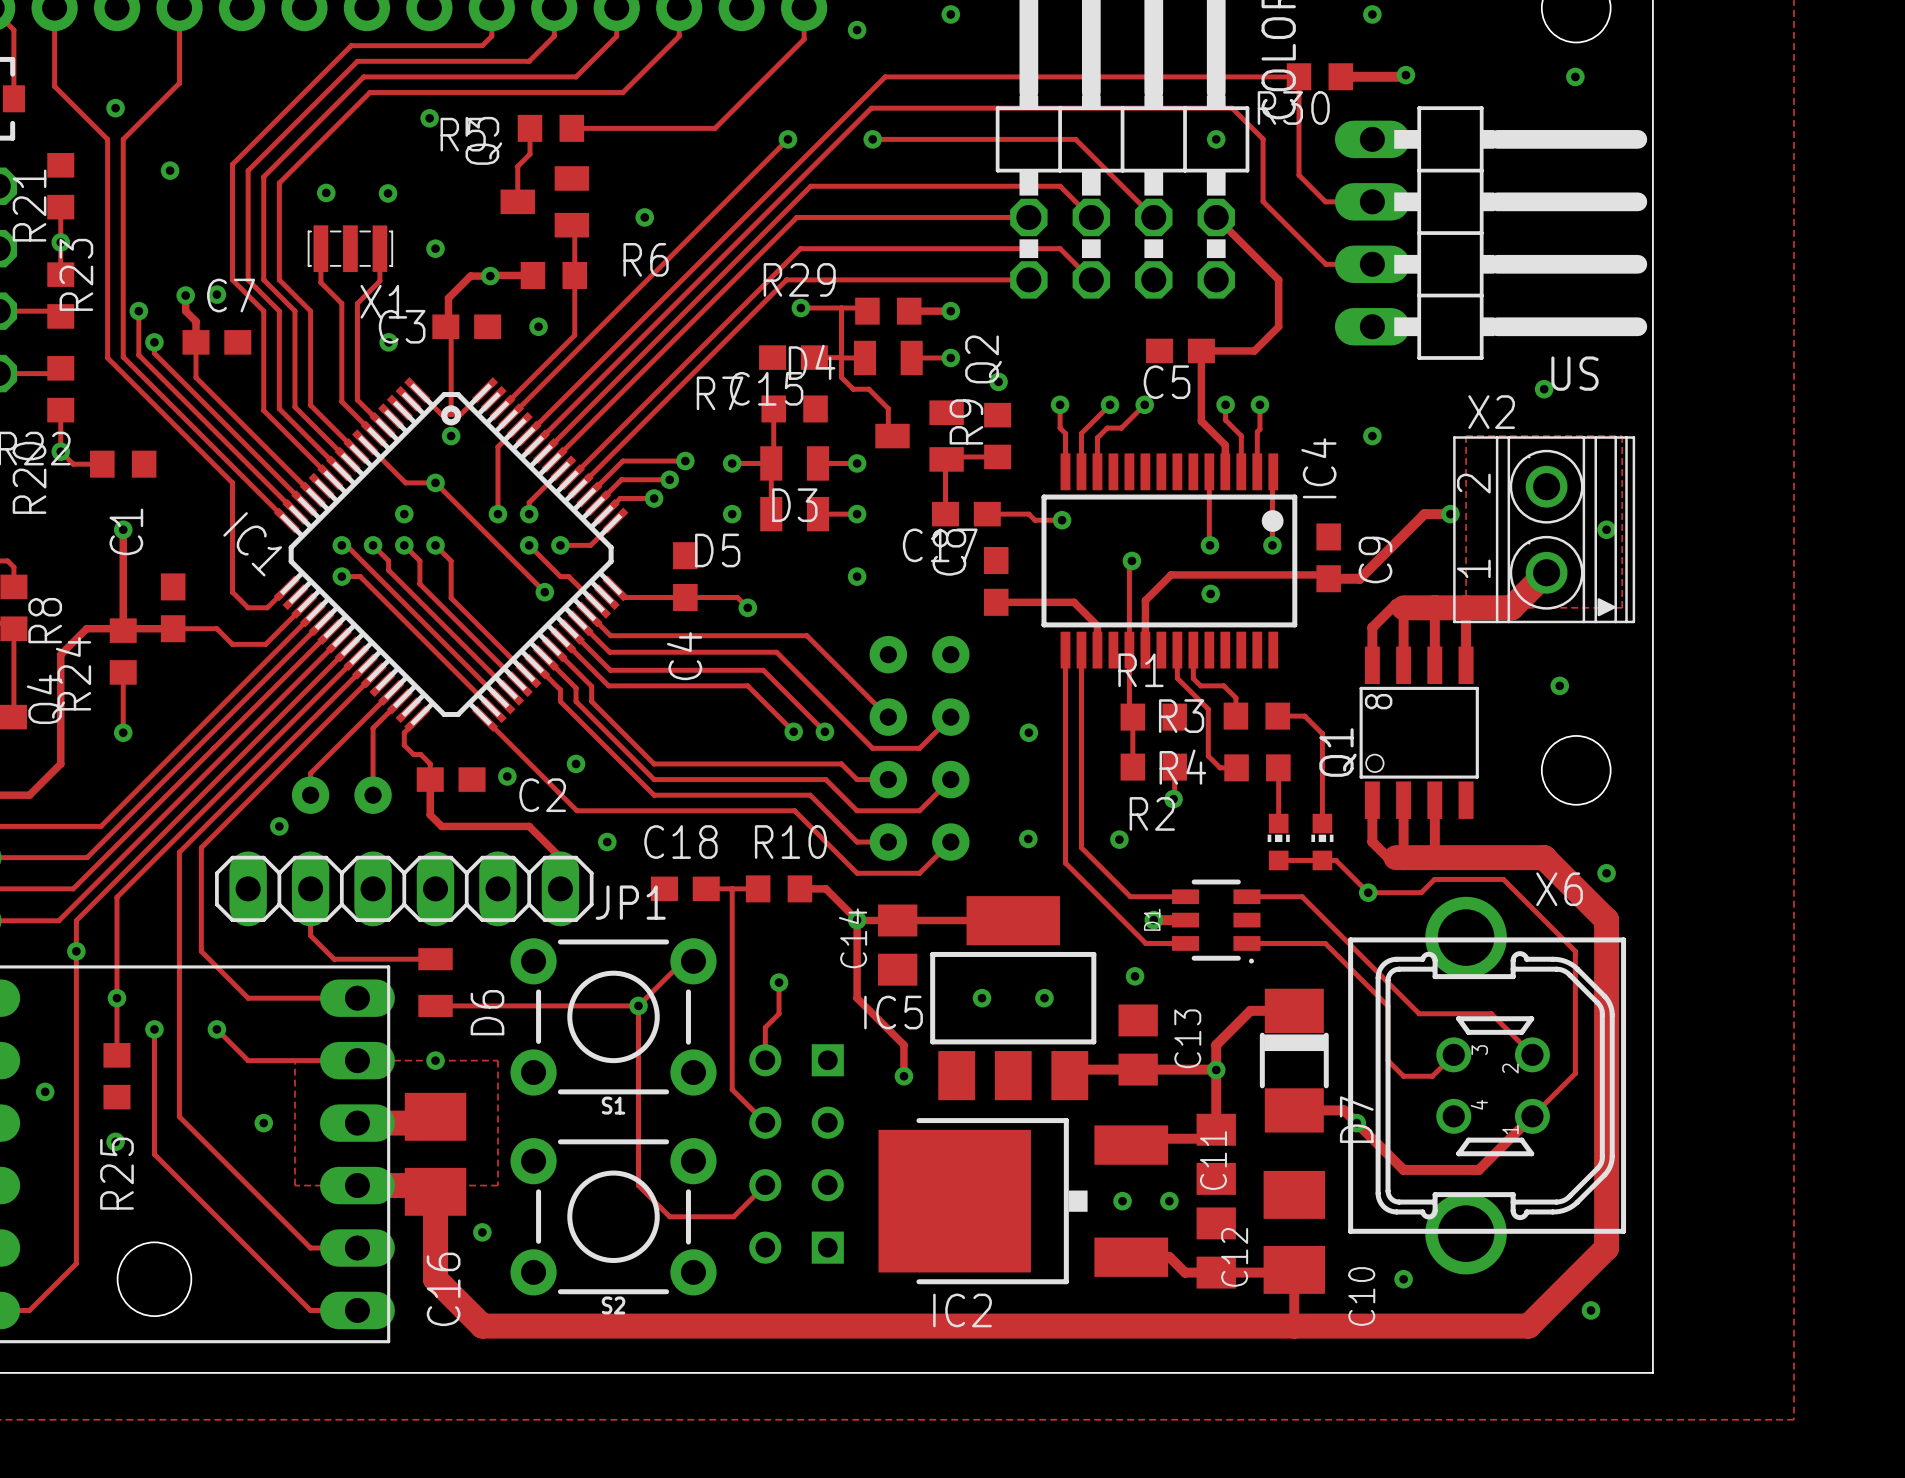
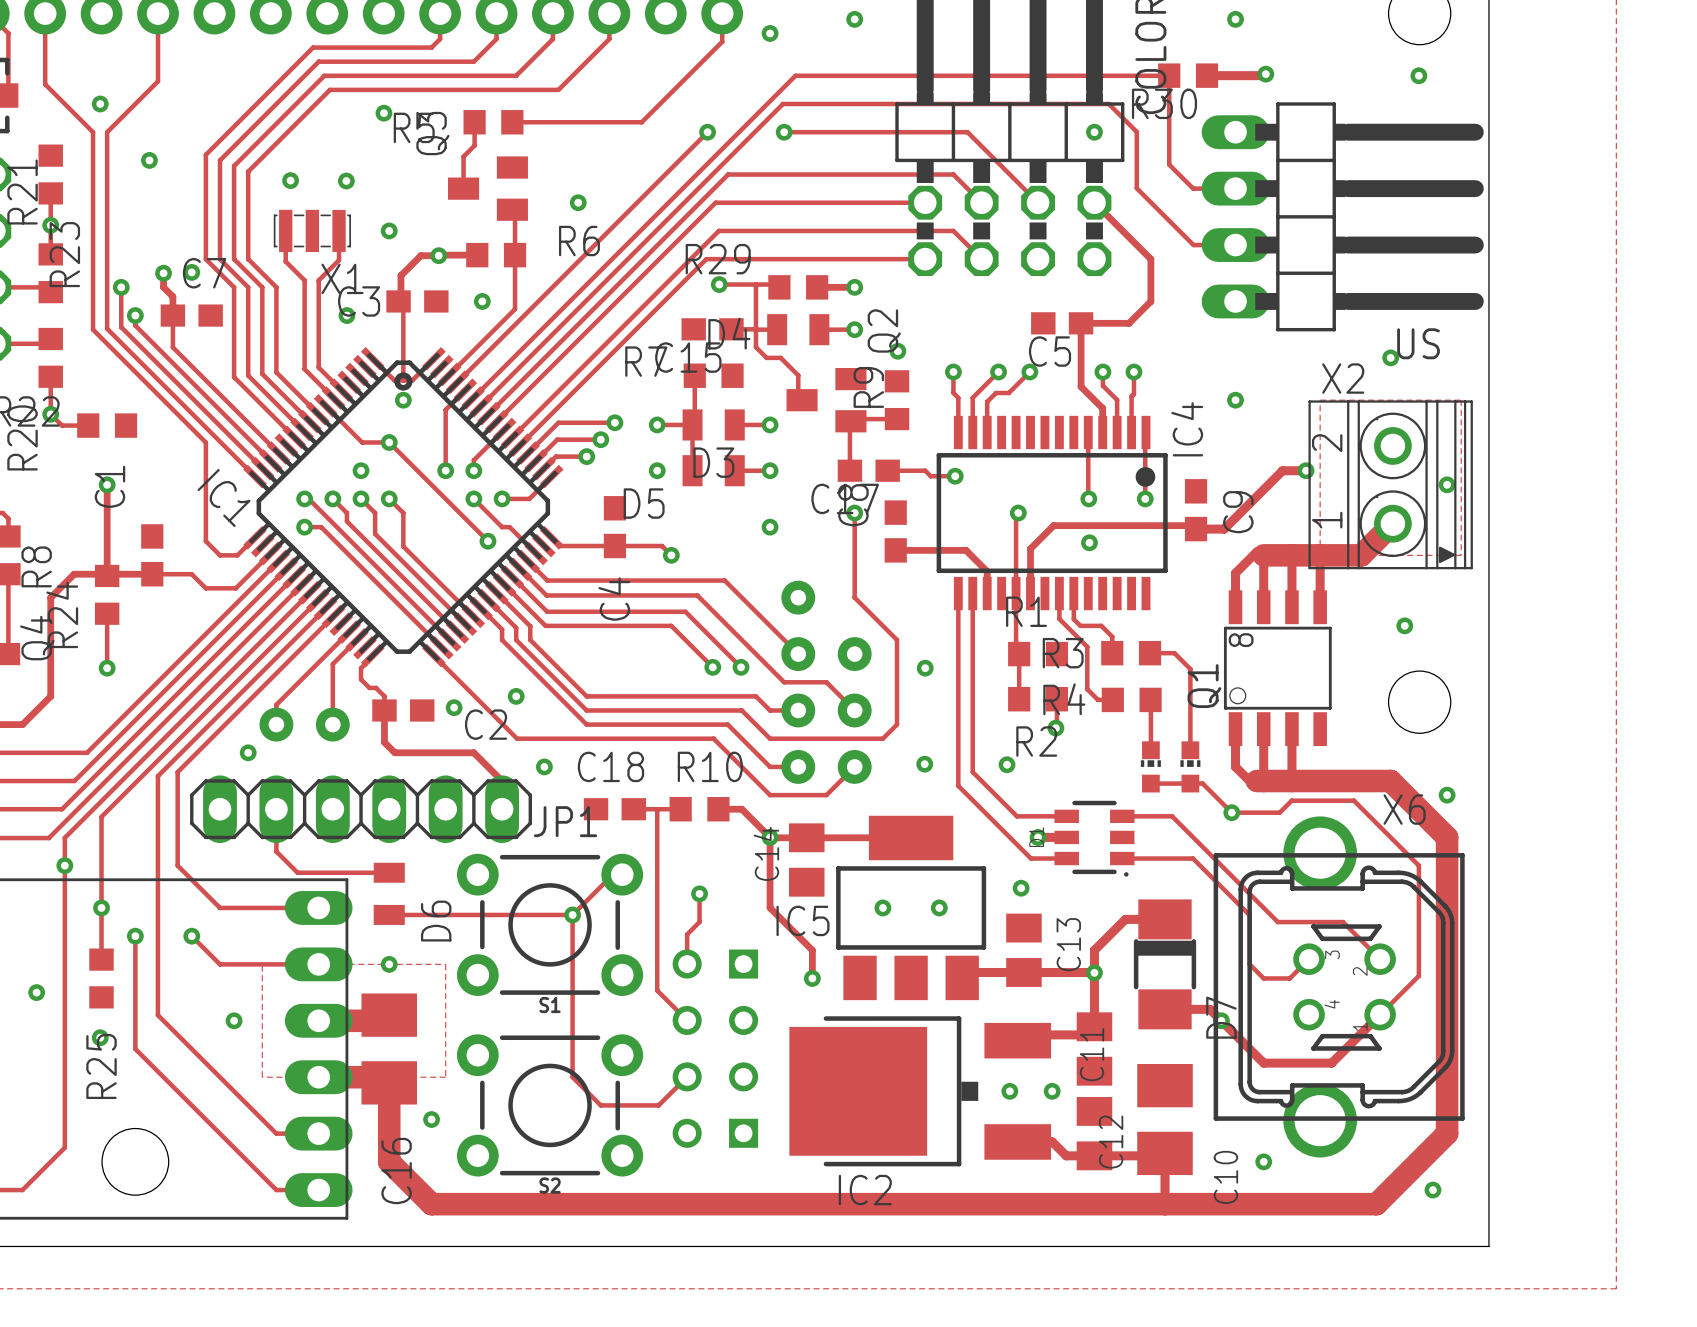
track: none -> (854, 513) (854, 597) (897, 639) (897, 724) (882, 738) (826, 738)
via: none -> (854, 513)
via: (950, 654) -> none
track: (950, 717) (919, 748) -> none
track: (950, 779) (919, 810) -> (854, 710) (826, 682)

